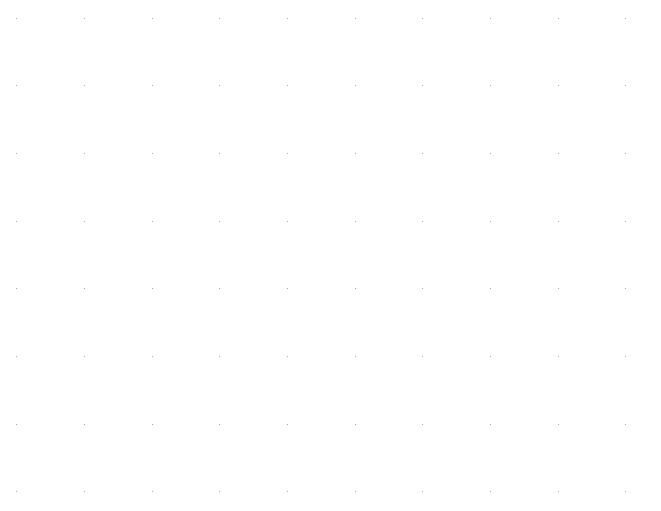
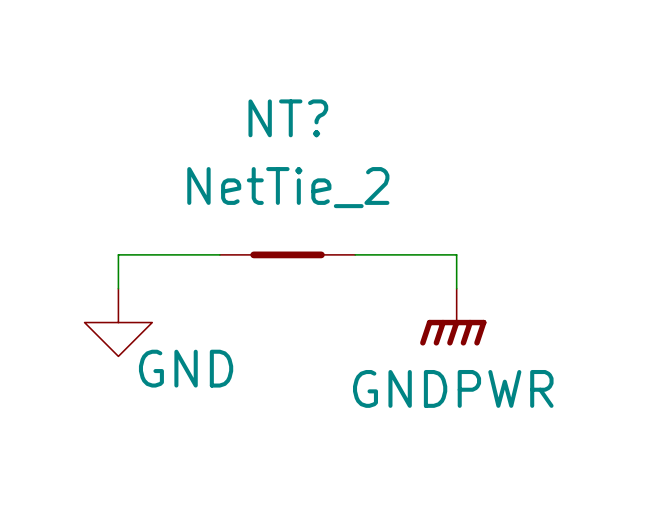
wire: none -> (219, 254) (118, 254) (118, 288)
NT?: none -> NetTie_2 (287, 254)
wire: none -> (355, 254) (456, 254) (456, 288)
power symbol: none -> GNDPWR (453, 317)
power symbol: none -> GND (118, 322)

